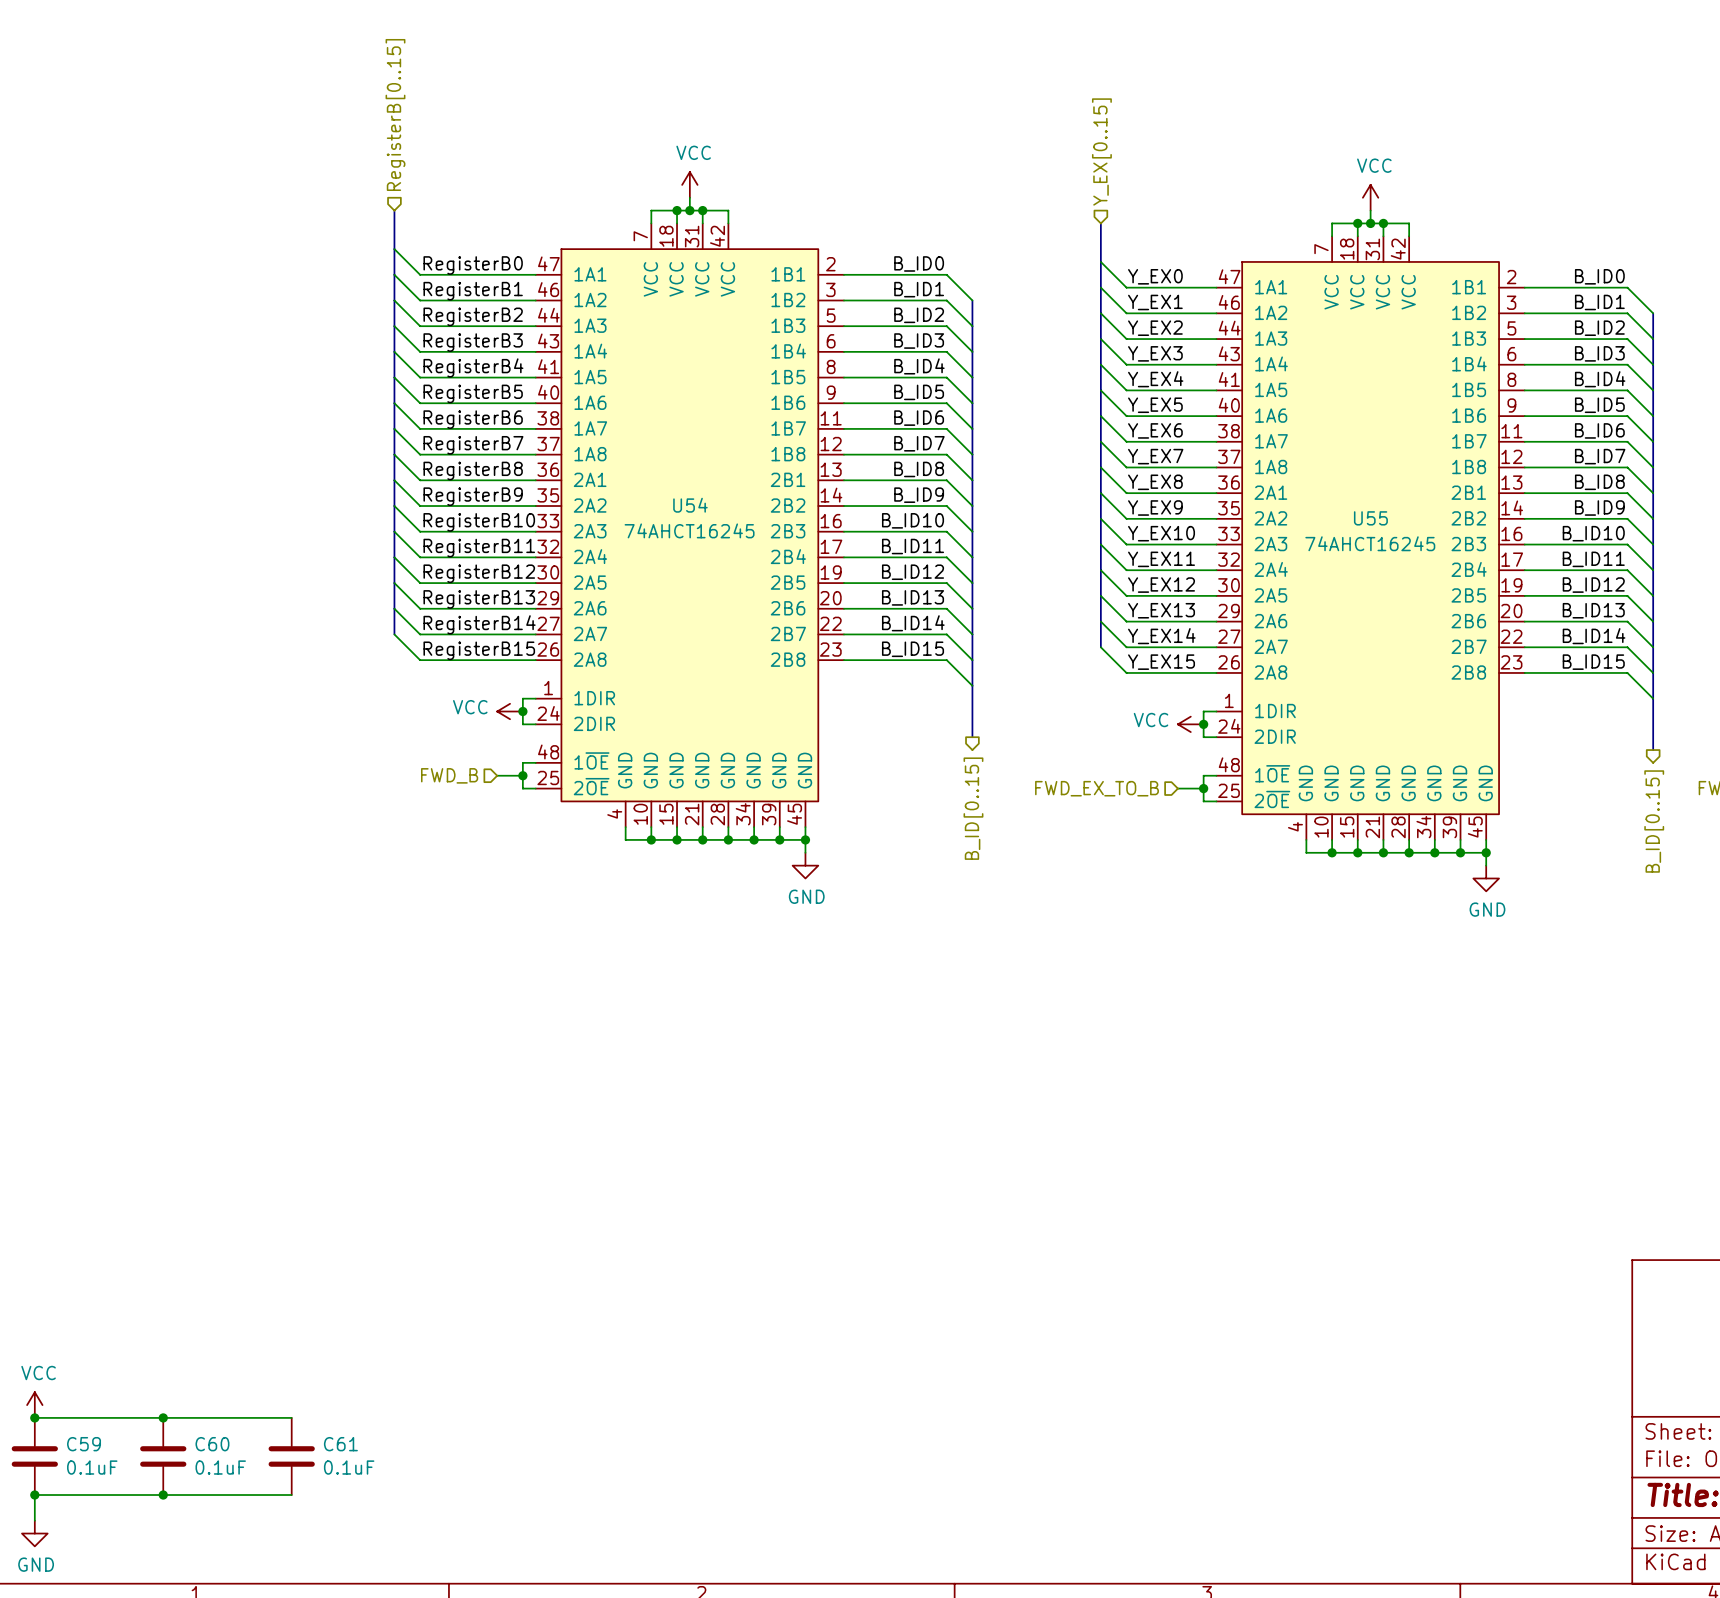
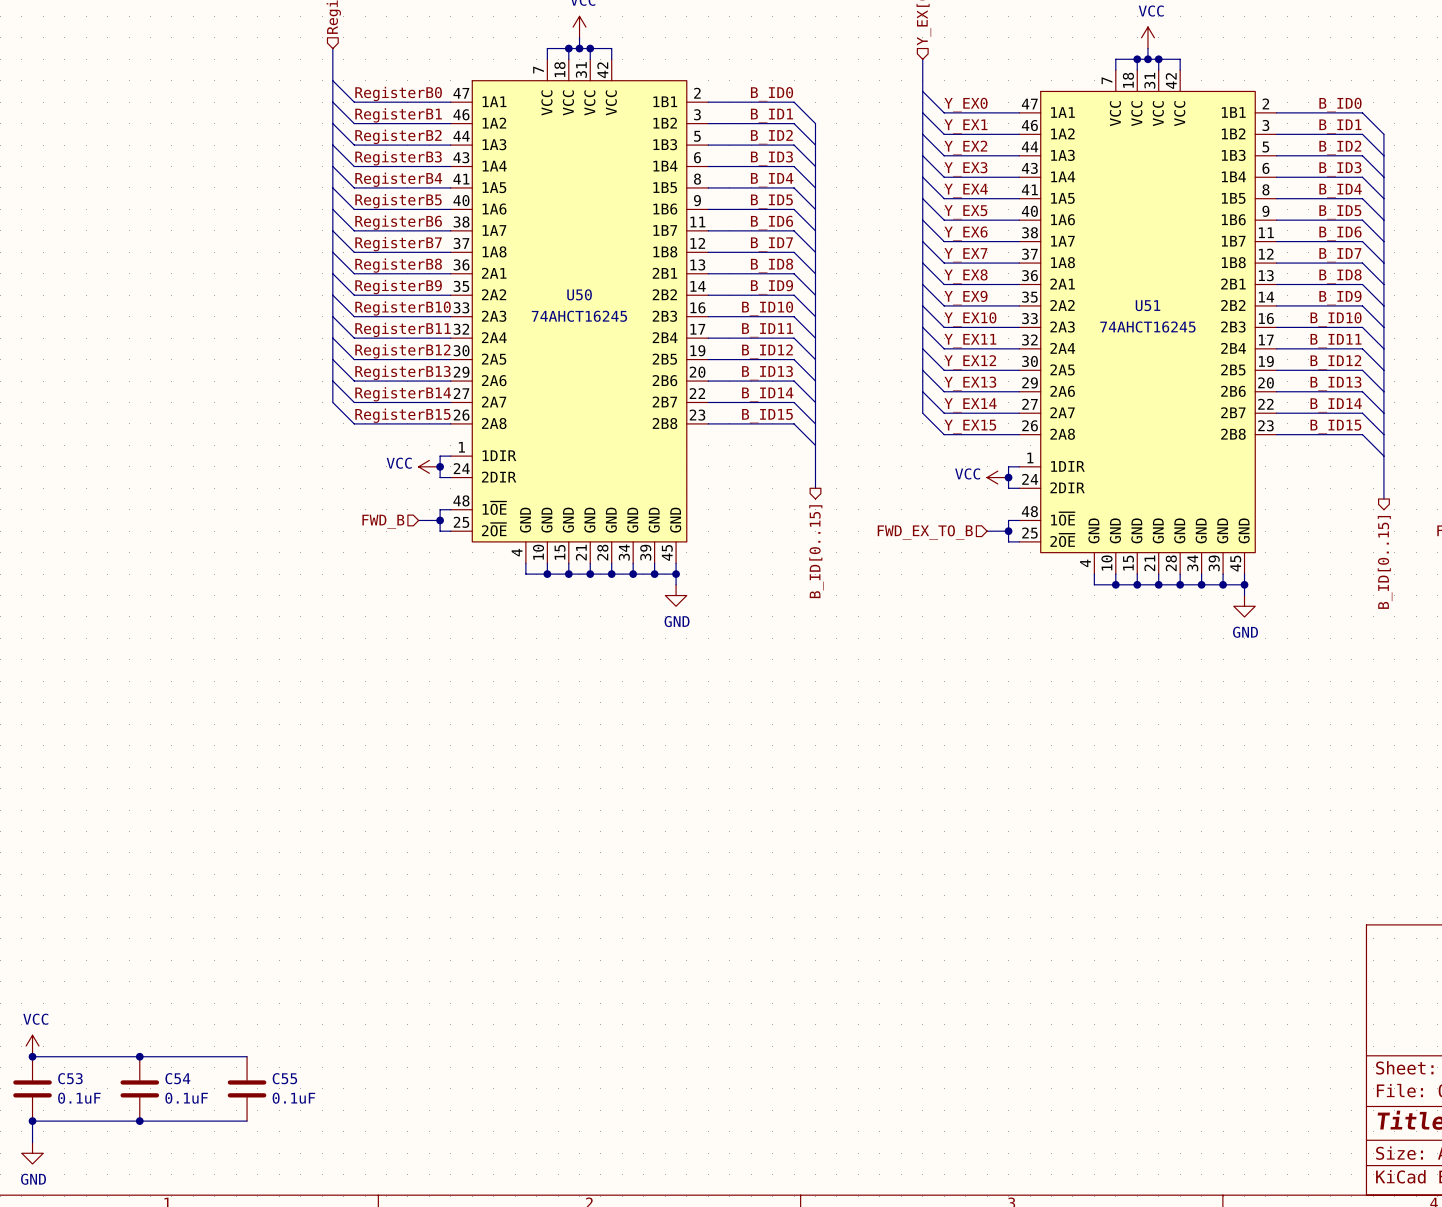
U54 name: U54 (690, 505) -> U50 (579, 294)
U55 name: U55 (1370, 518) -> U51 (1148, 305)
C59 name: C59 (84, 1444) -> C53 (70, 1078)
C60 name: C60 (212, 1444) -> C54 (177, 1078)
C61 name: C61 (340, 1444) -> C55 (284, 1078)

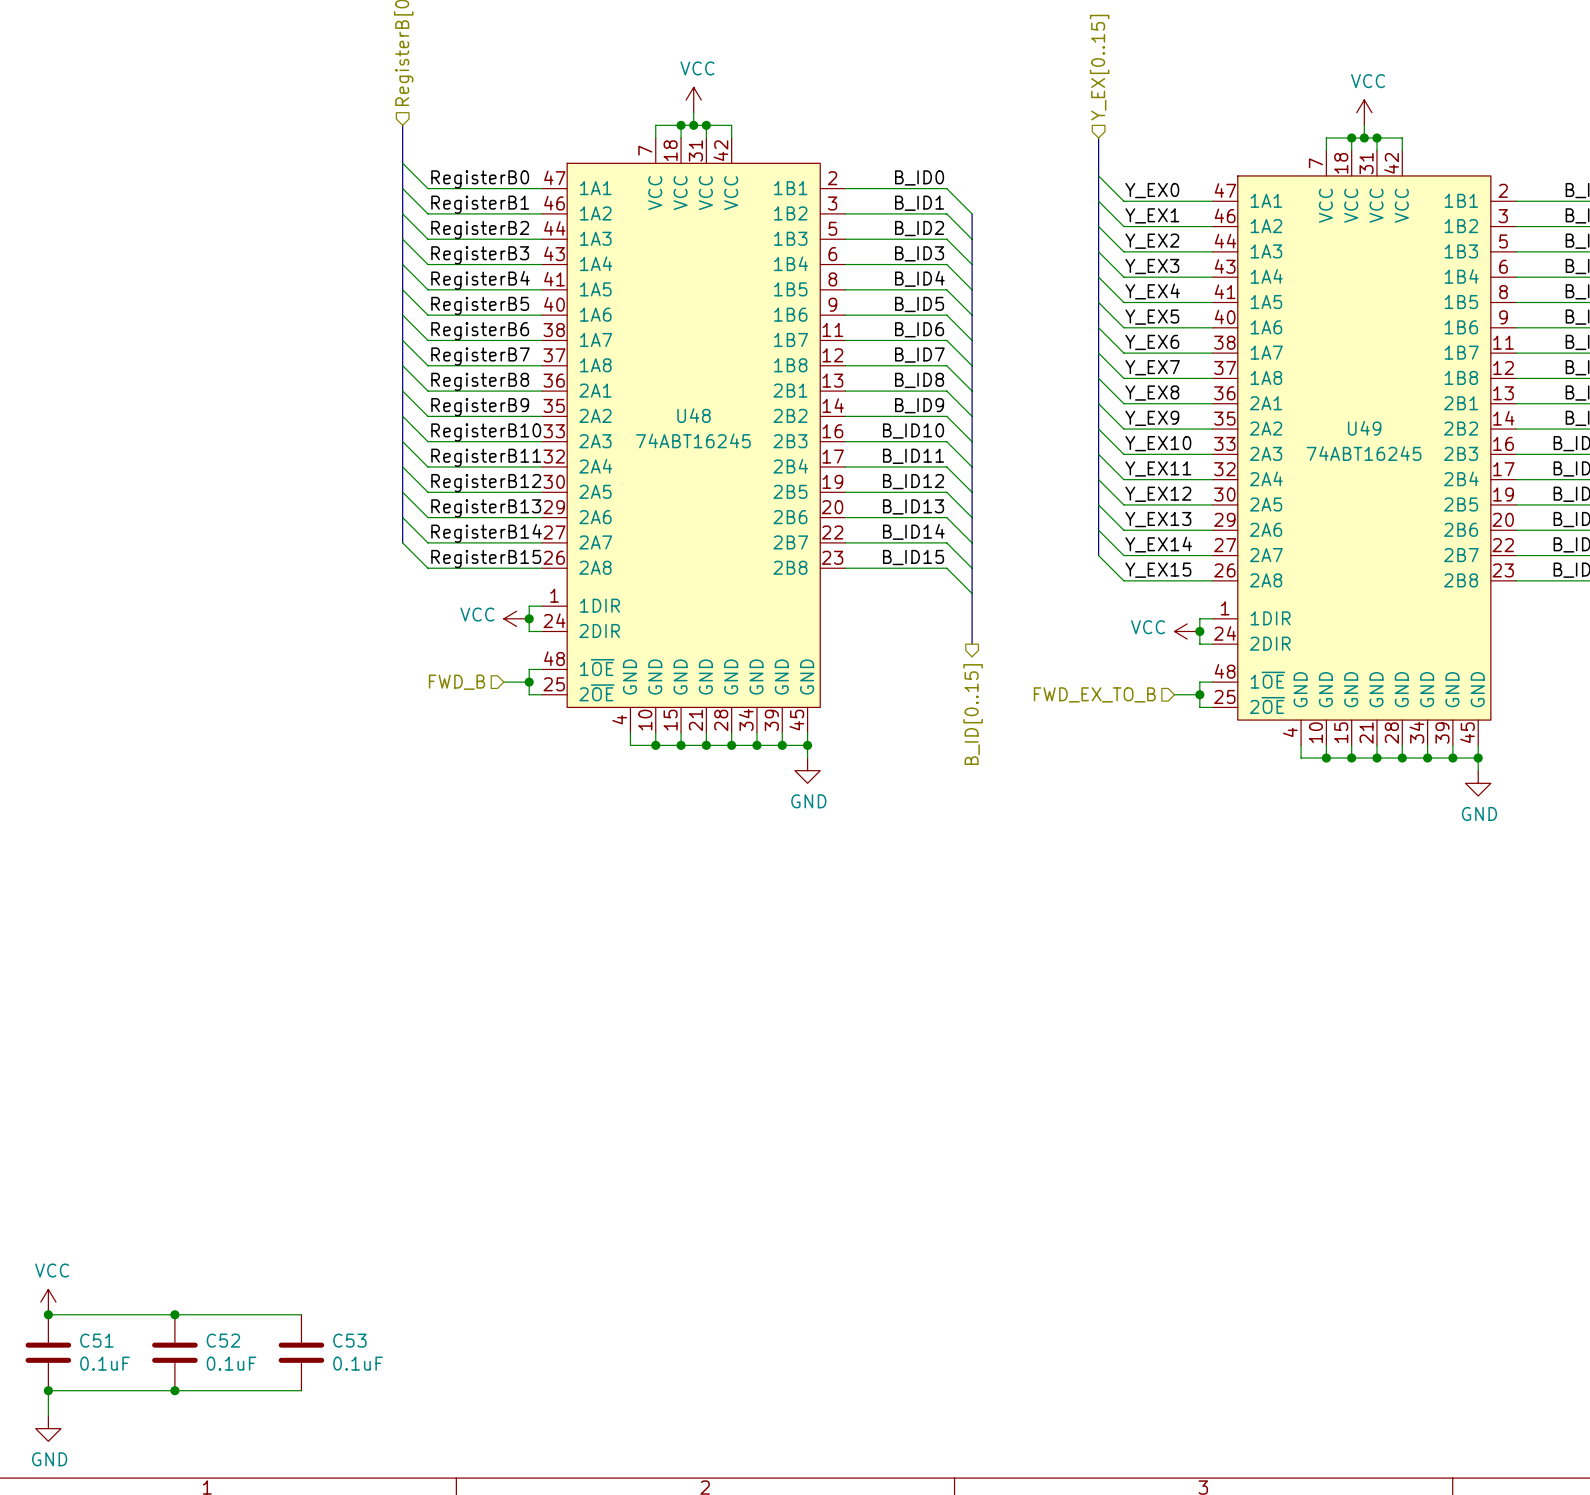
U50 name: U50 (579, 294) -> U48 (694, 415)
U51 name: U51 (1148, 305) -> U49 (1364, 428)
U50 value: 74AHCT16245 (579, 316) -> 74ABT16245 (693, 440)
U51 value: 74AHCT16245 (1147, 327) -> 74ABT16245 (1364, 453)
C53 name: C53 (70, 1078) -> C51 (96, 1340)
C54 name: C54 (177, 1078) -> C52 (223, 1340)
C55 name: C55 (284, 1078) -> C53 (349, 1340)

